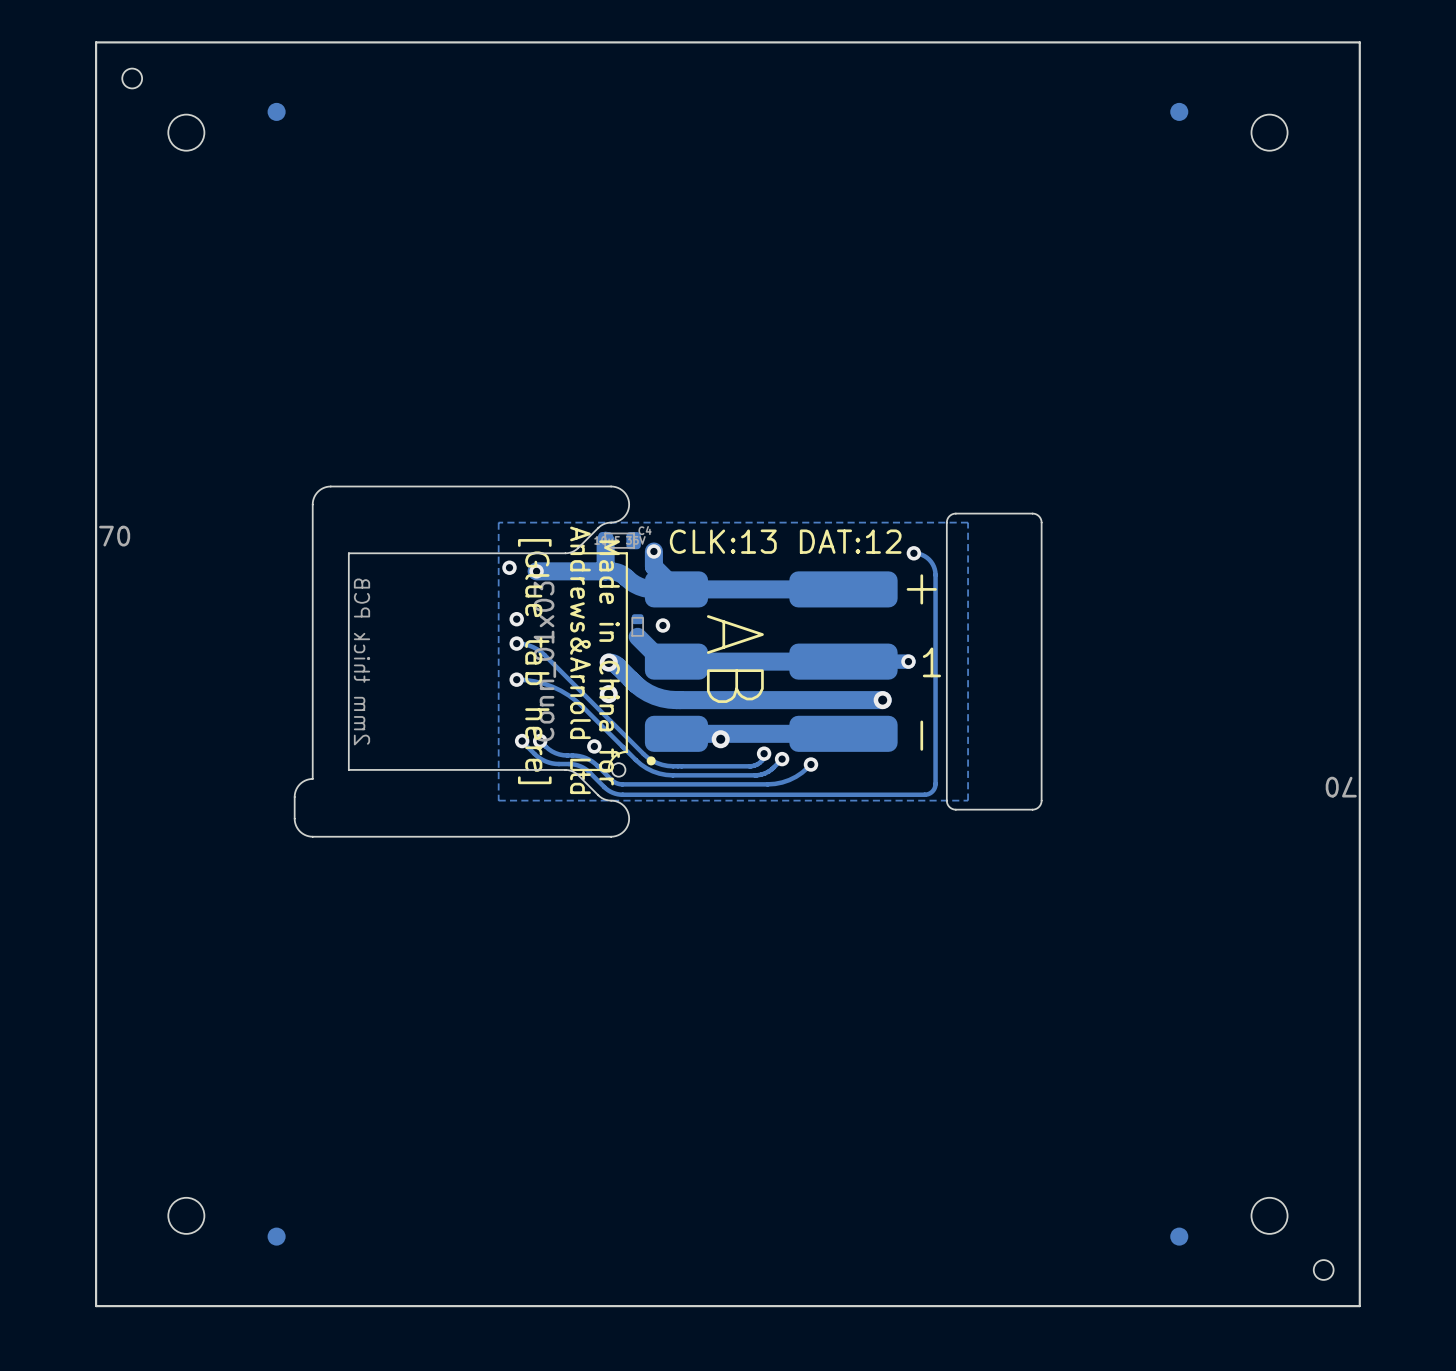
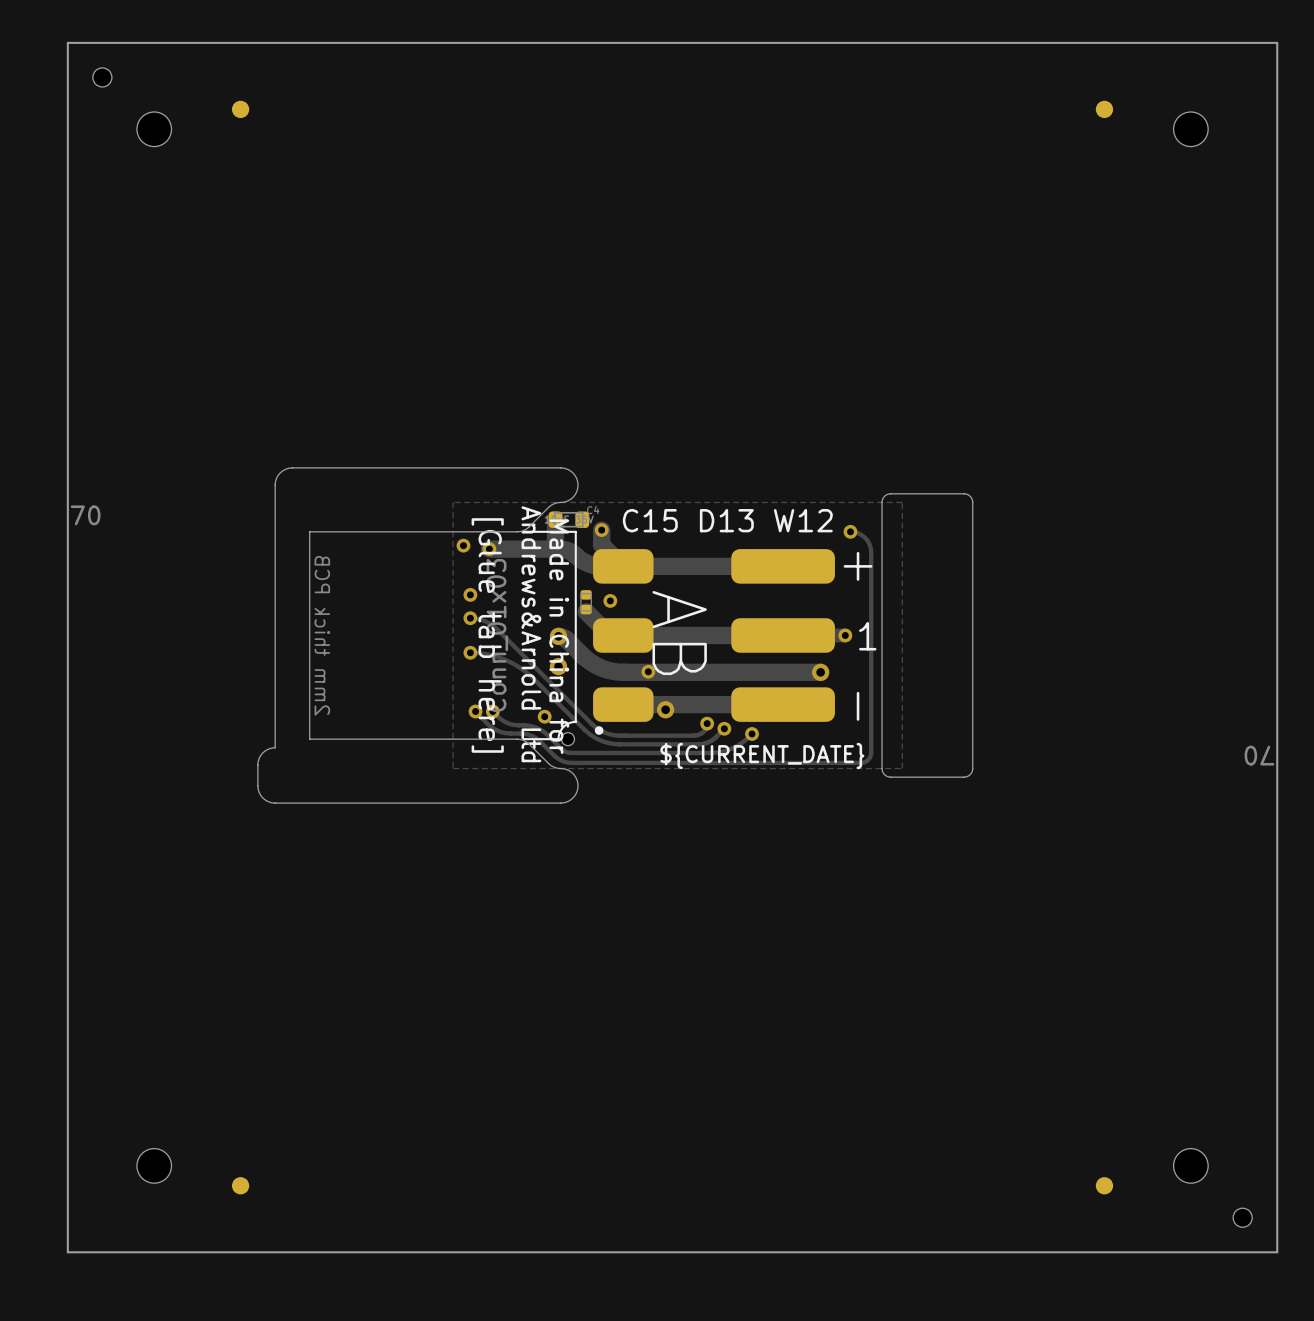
text: CLK:13 DAT:12 (785, 541) -> C15 D13 W12 (727, 520)
via: none -> (648, 671)
text: none -> ${CURRENT_DATE} (762, 755)

